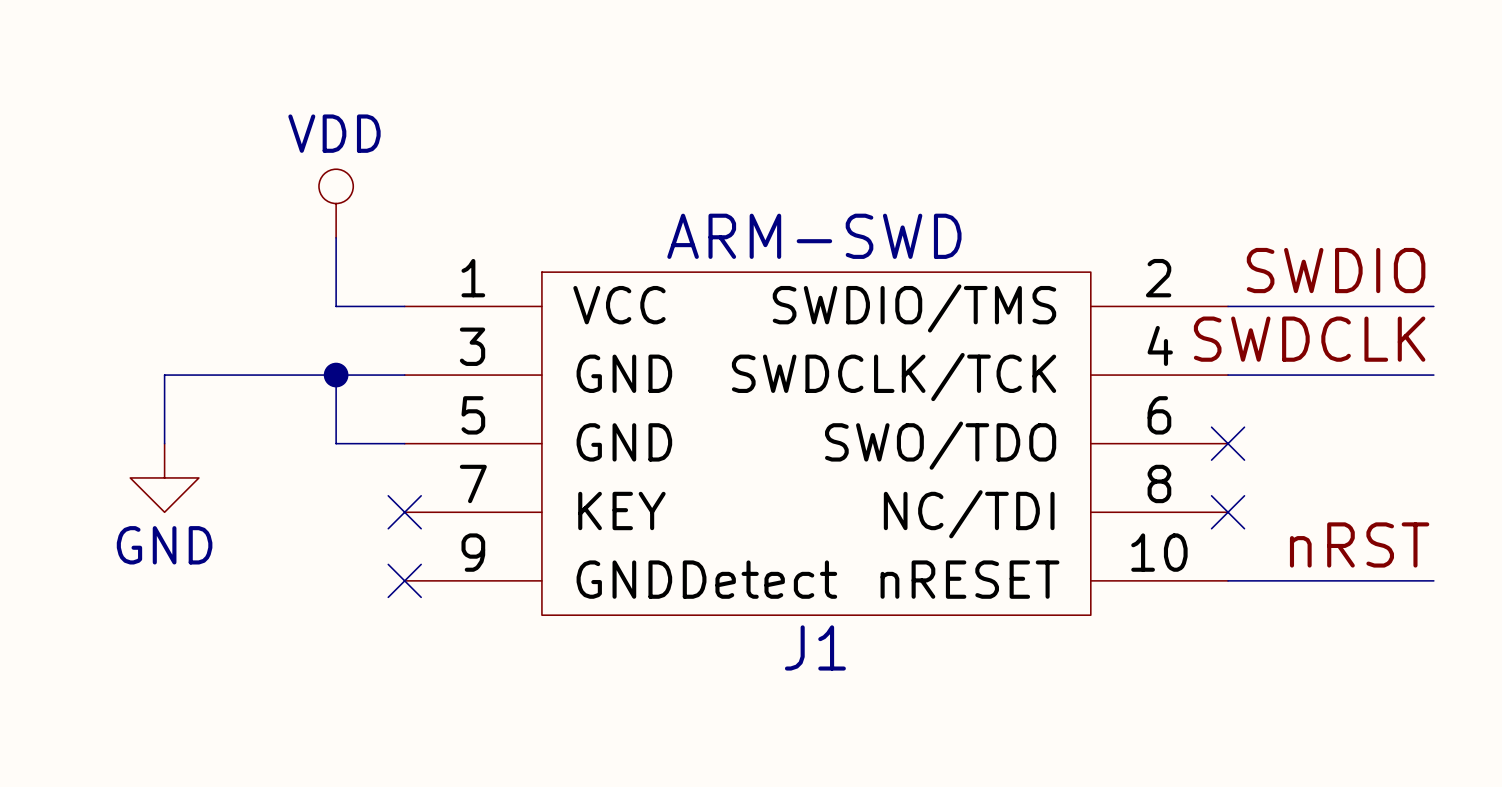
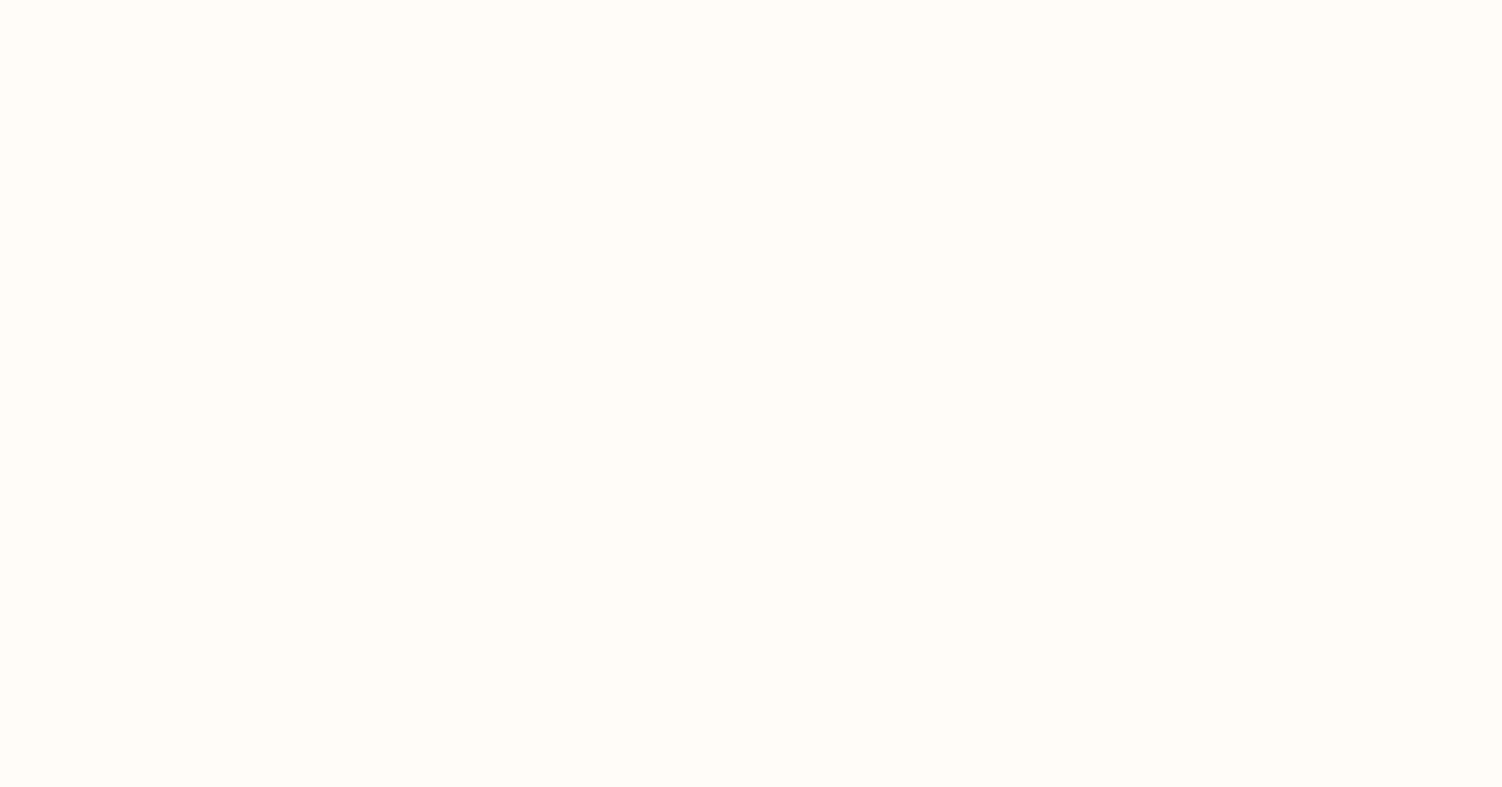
power symbol: VDD (336, 203) -> none
wire: (336, 237) (336, 306) (404, 306) -> none
label: SWDIO (1336, 270) -> none
wire: (1228, 306) (1433, 306) -> none
label: SWDCLK (1309, 339) -> none
wire: (336, 375) (336, 443) (404, 443) -> none
junction: (336, 375) -> none
wire: (404, 375) (164, 375) (164, 443) -> none
wire: (1228, 375) (1433, 375) -> none
J1: ARM-SWD (816, 443) -> none
no-connect mark: (1228, 443) -> none
power symbol: GND (164, 477) -> none
no-connect mark: (404, 512) -> none
no-connect mark: (1228, 512) -> none
label: nRST (1359, 544) -> none
no-connect mark: (404, 580) -> none
wire: (1228, 580) (1433, 580) -> none

